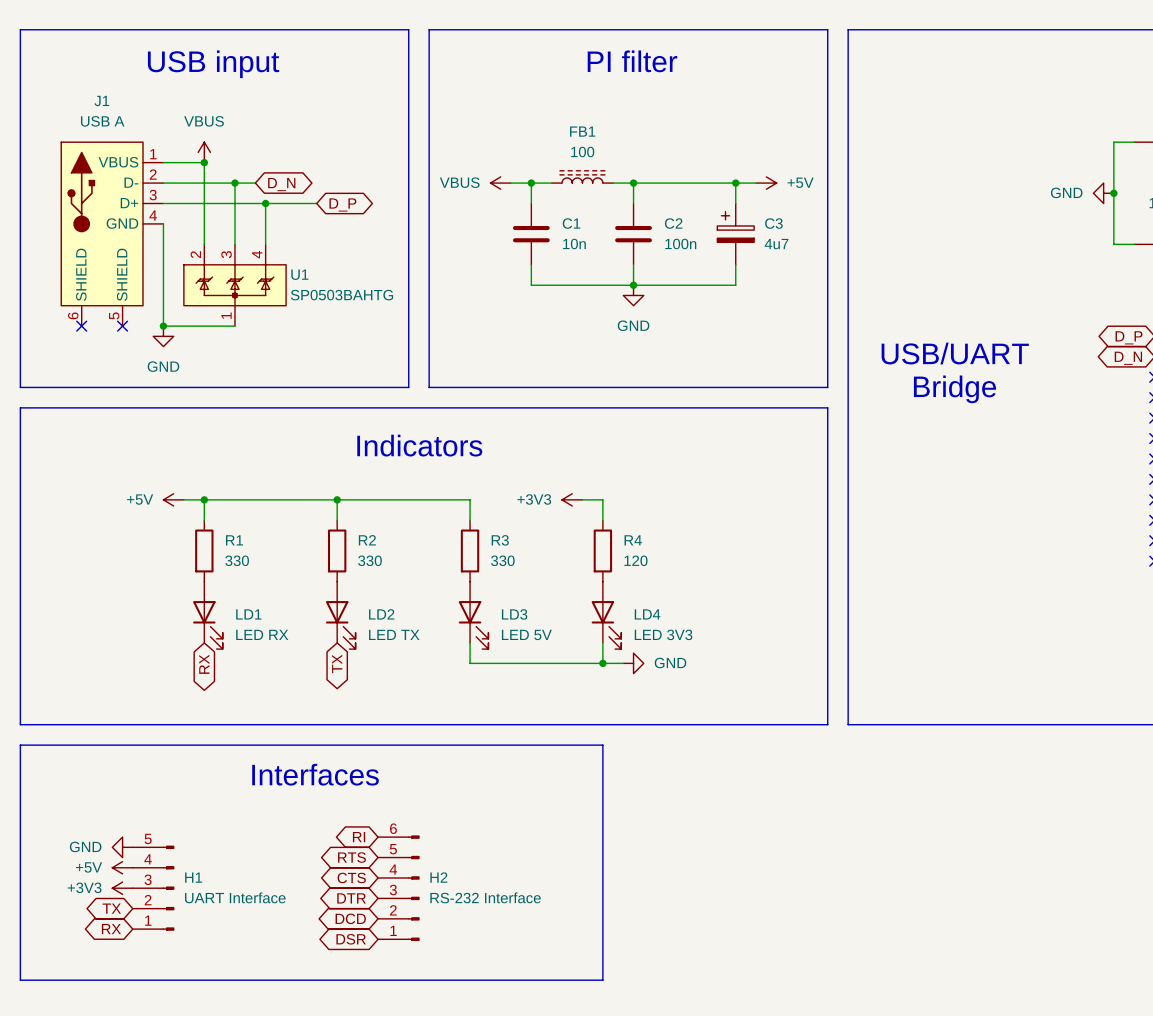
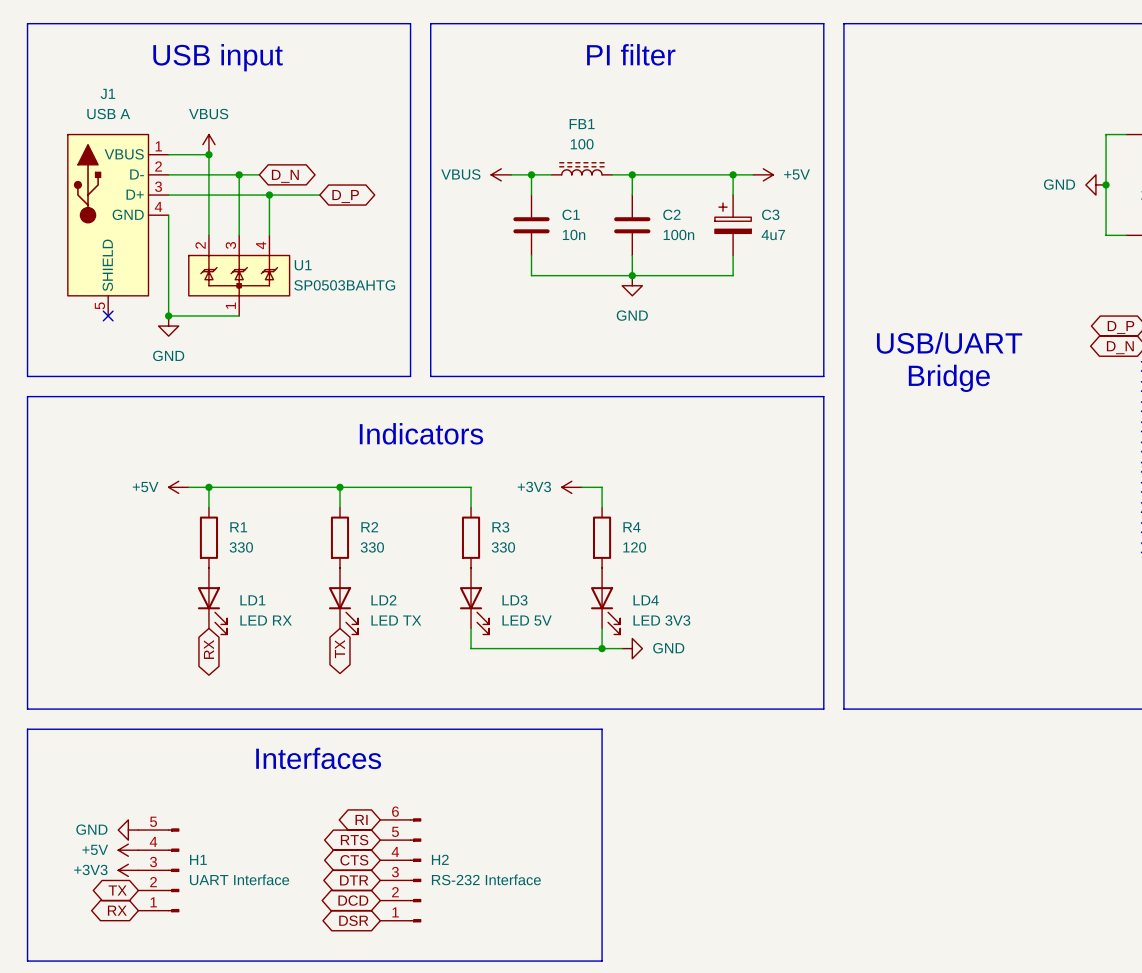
J1 symbol: [61, 142, 164, 327] -> [67, 134, 169, 316]
no-connect mark: (81, 326) -> none
no-connect mark: none -> (108, 315)
no-connect mark: (122, 326) -> none

